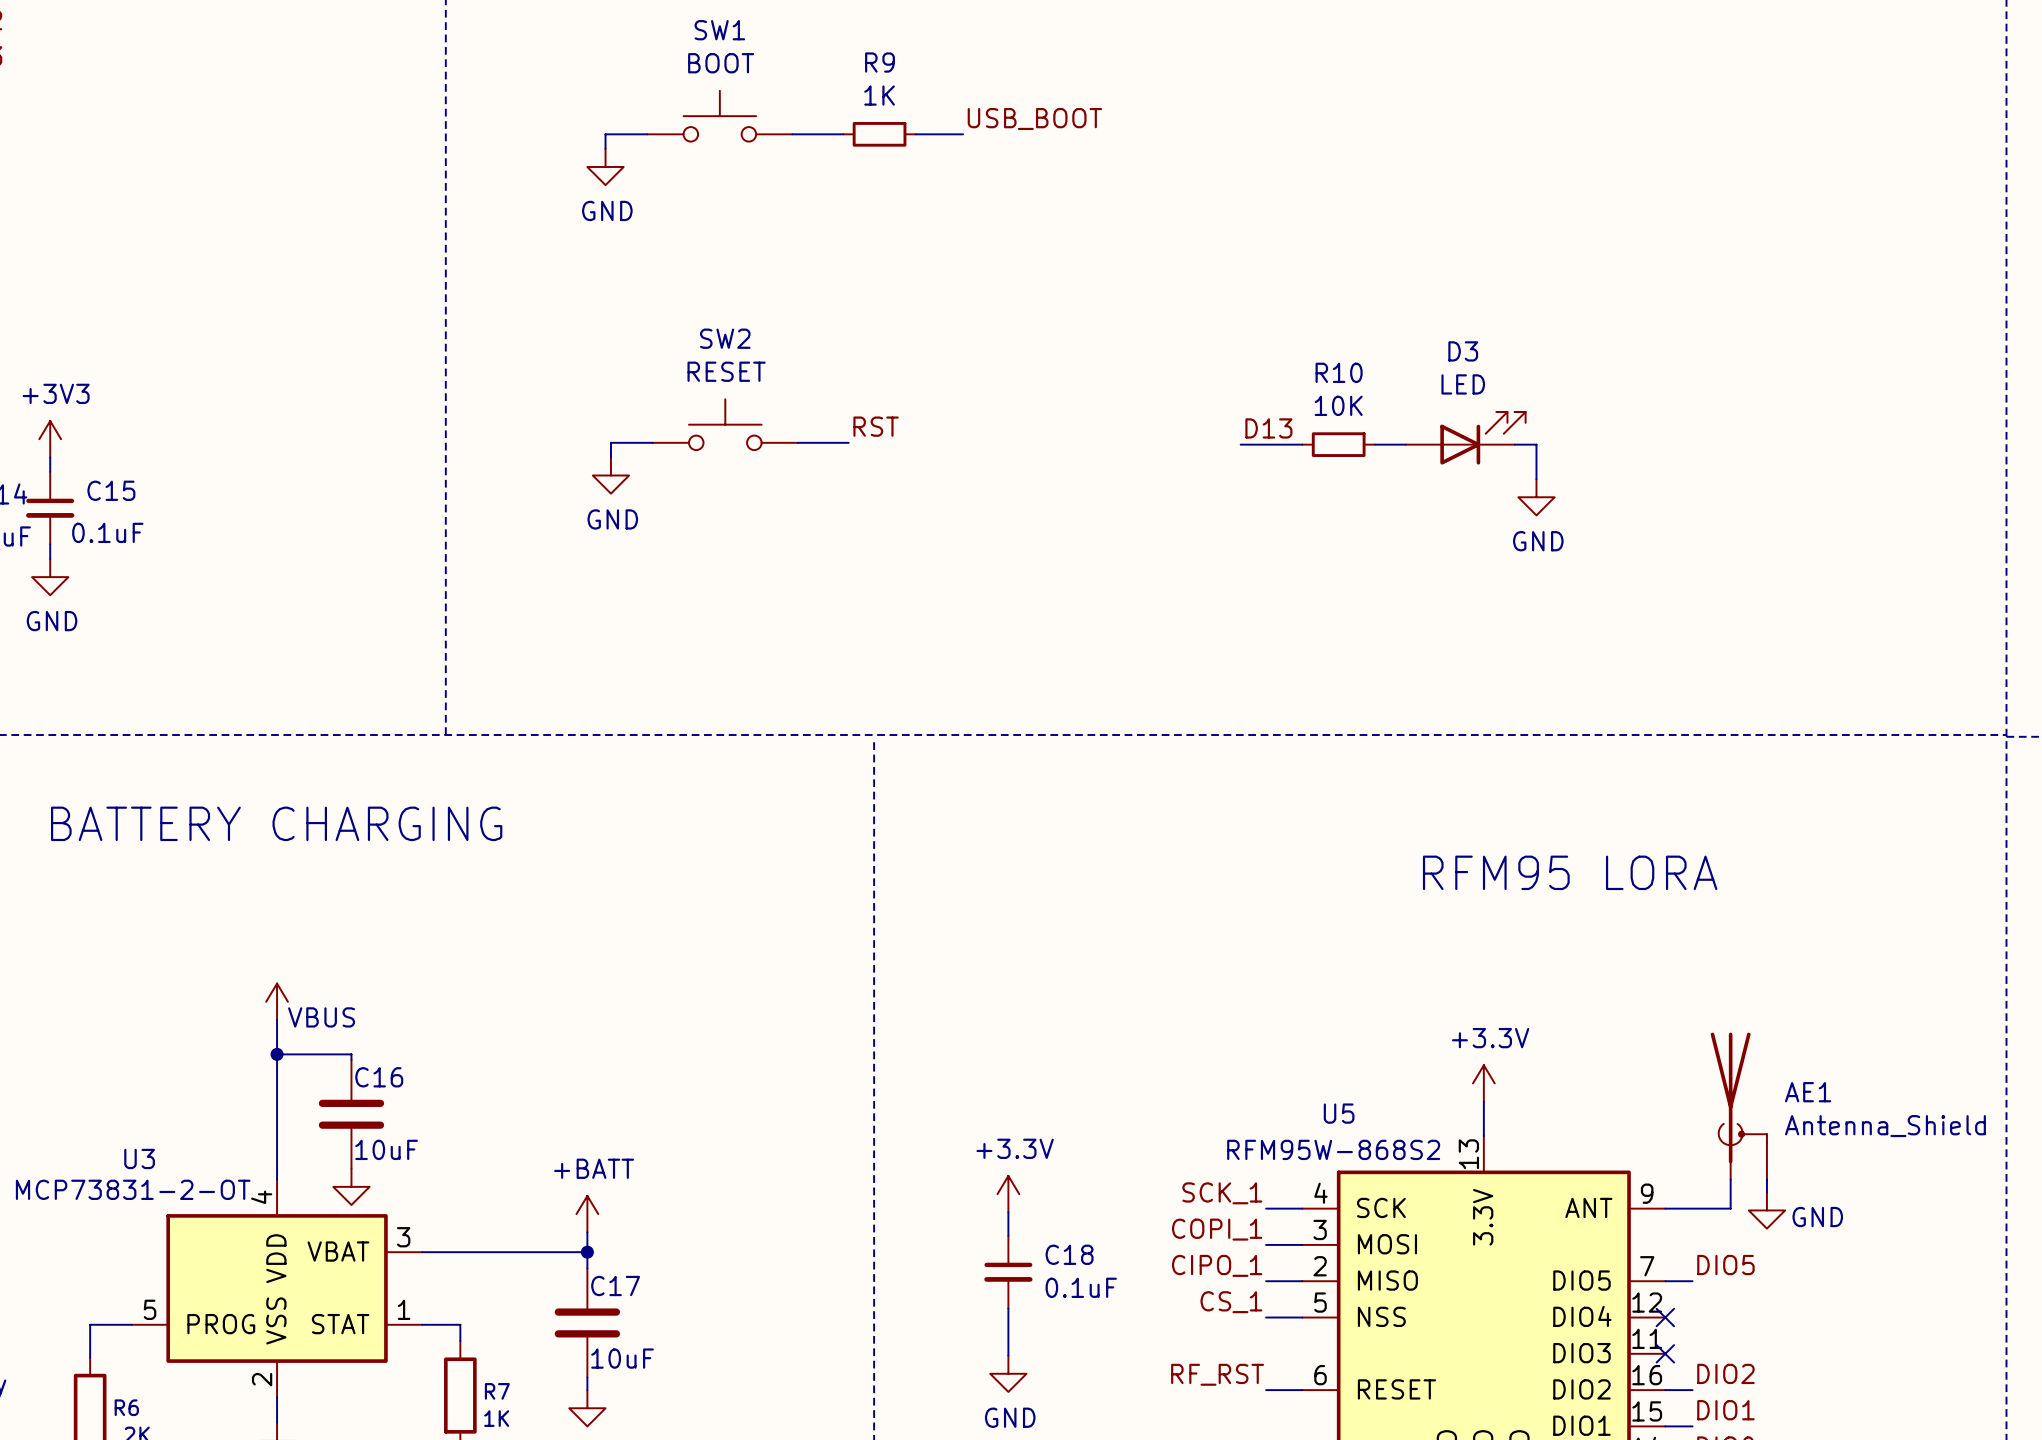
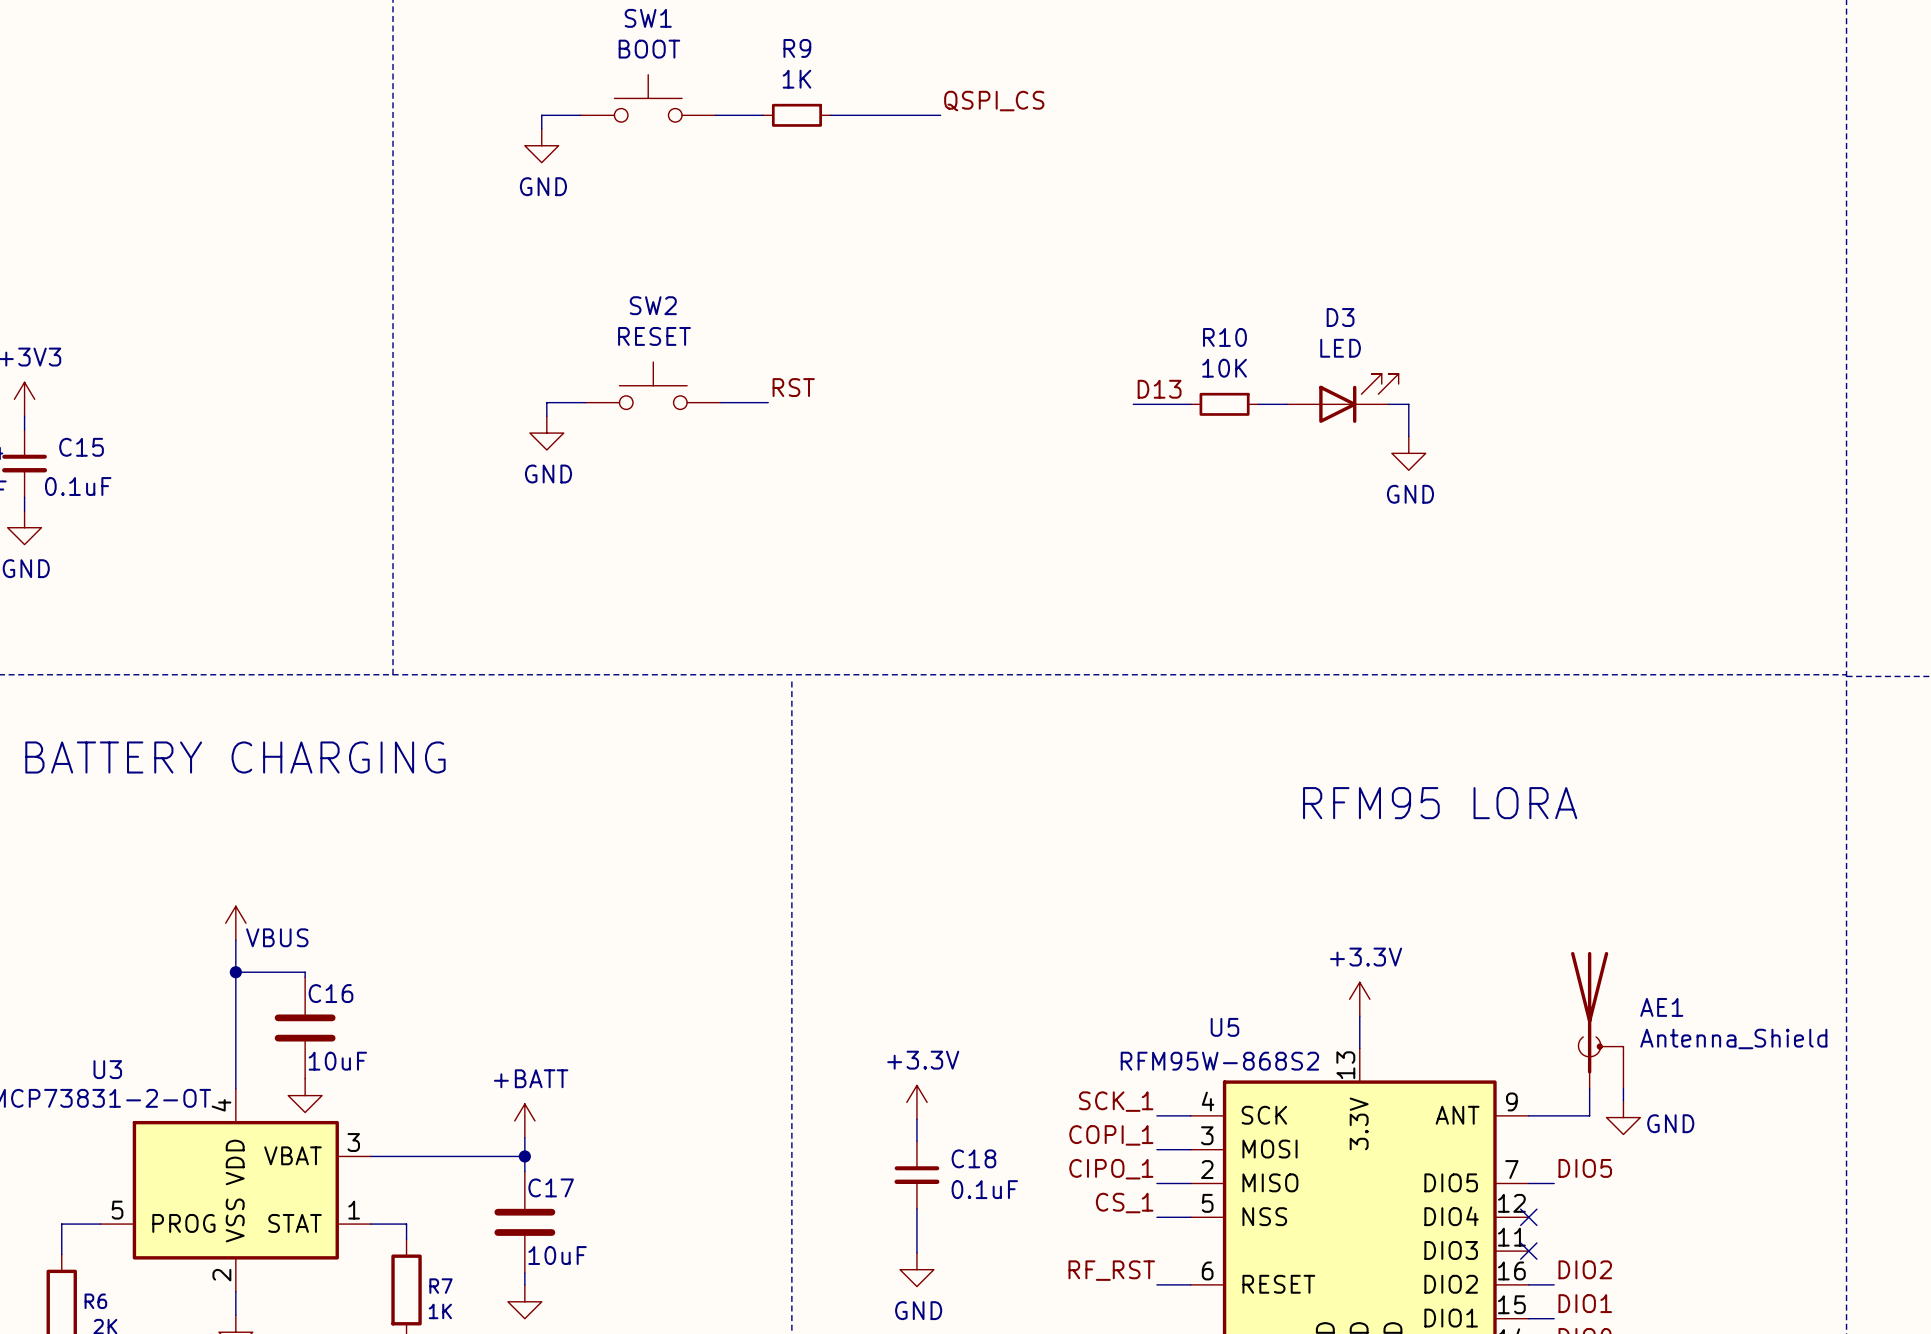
label: USB_BOOT (1034, 118) -> none
label: none -> QSPI_CS (994, 101)
wire: none -> (874, 115) (940, 115)

